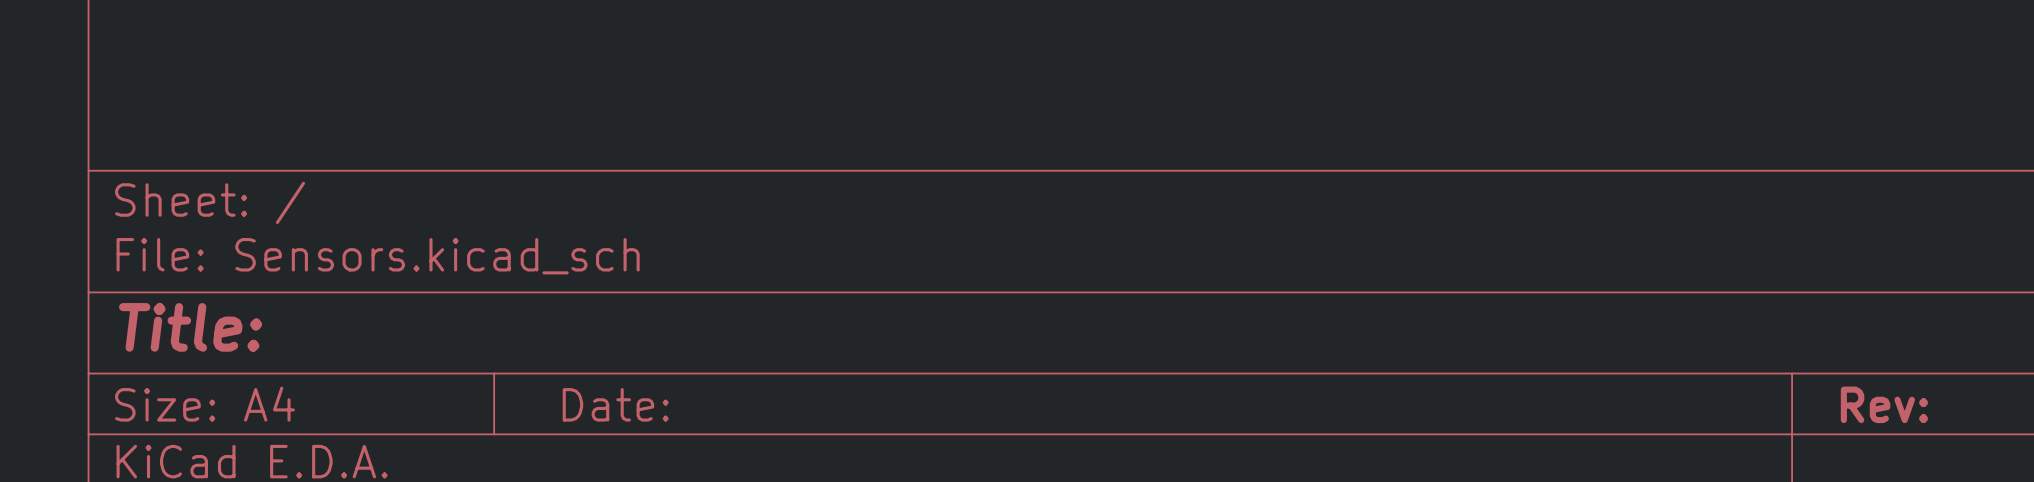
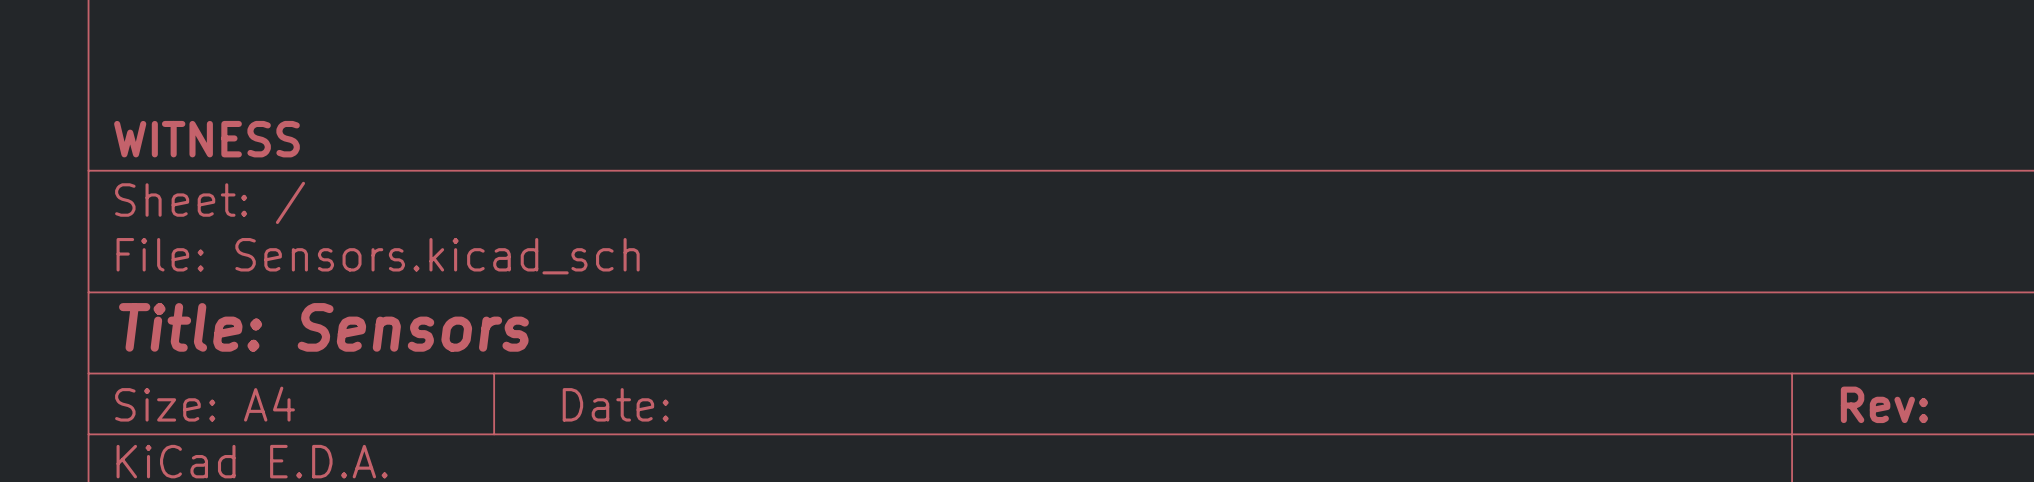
title block: none -> WITNESS (206, 139)
title block: Title: (190, 327) -> Title: Sensors (323, 327)

